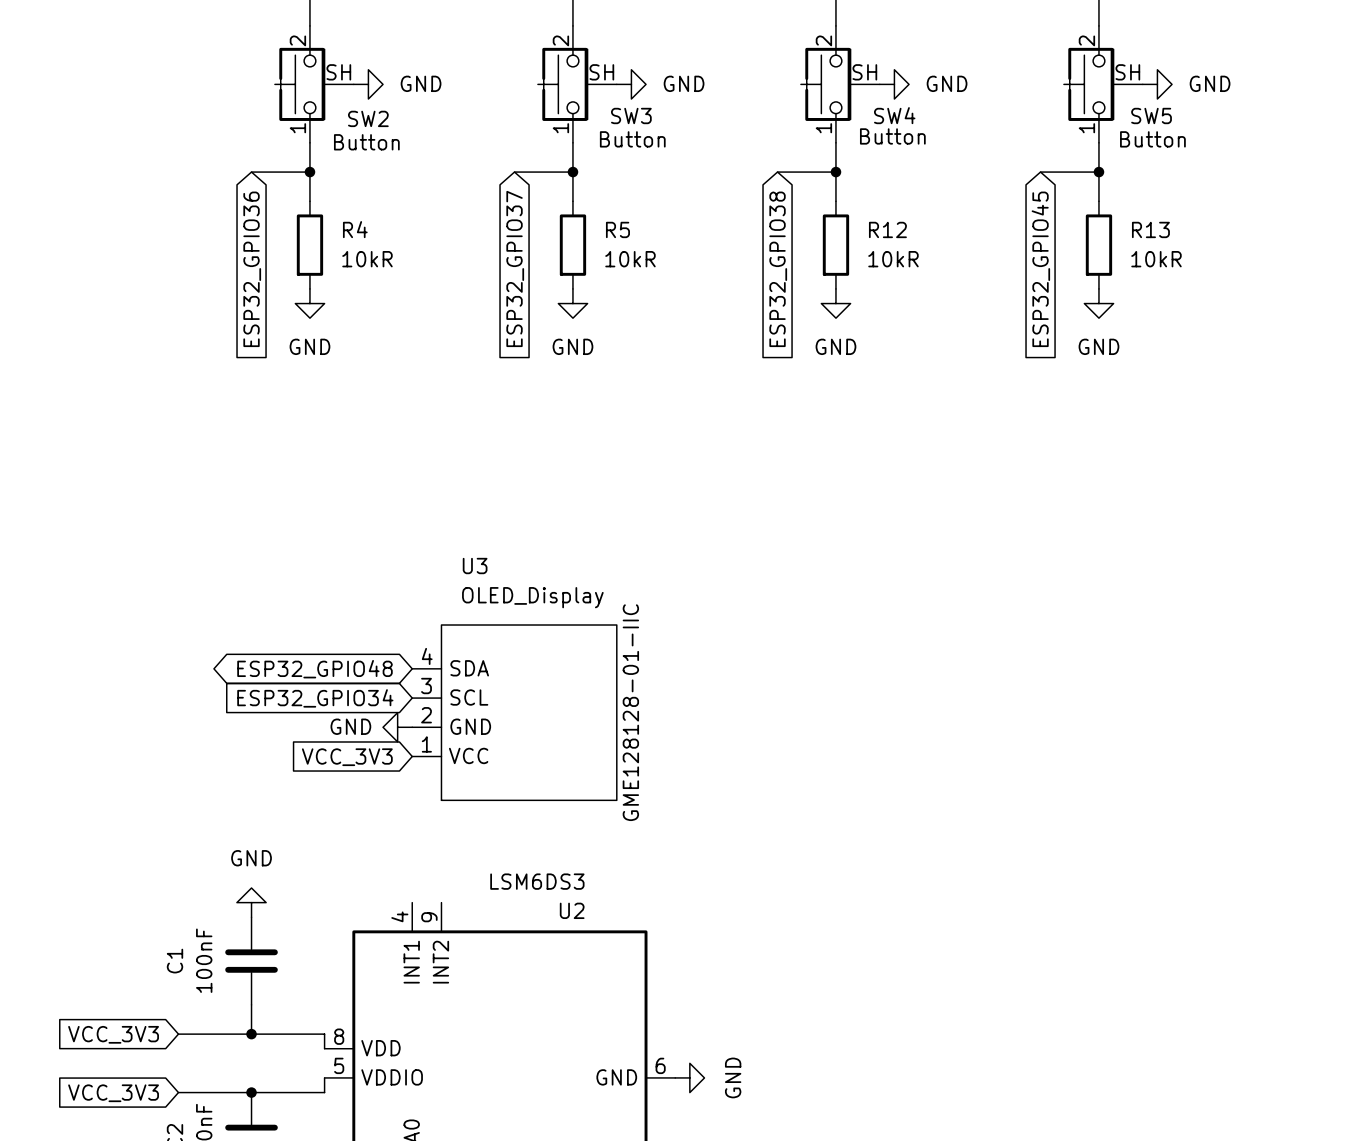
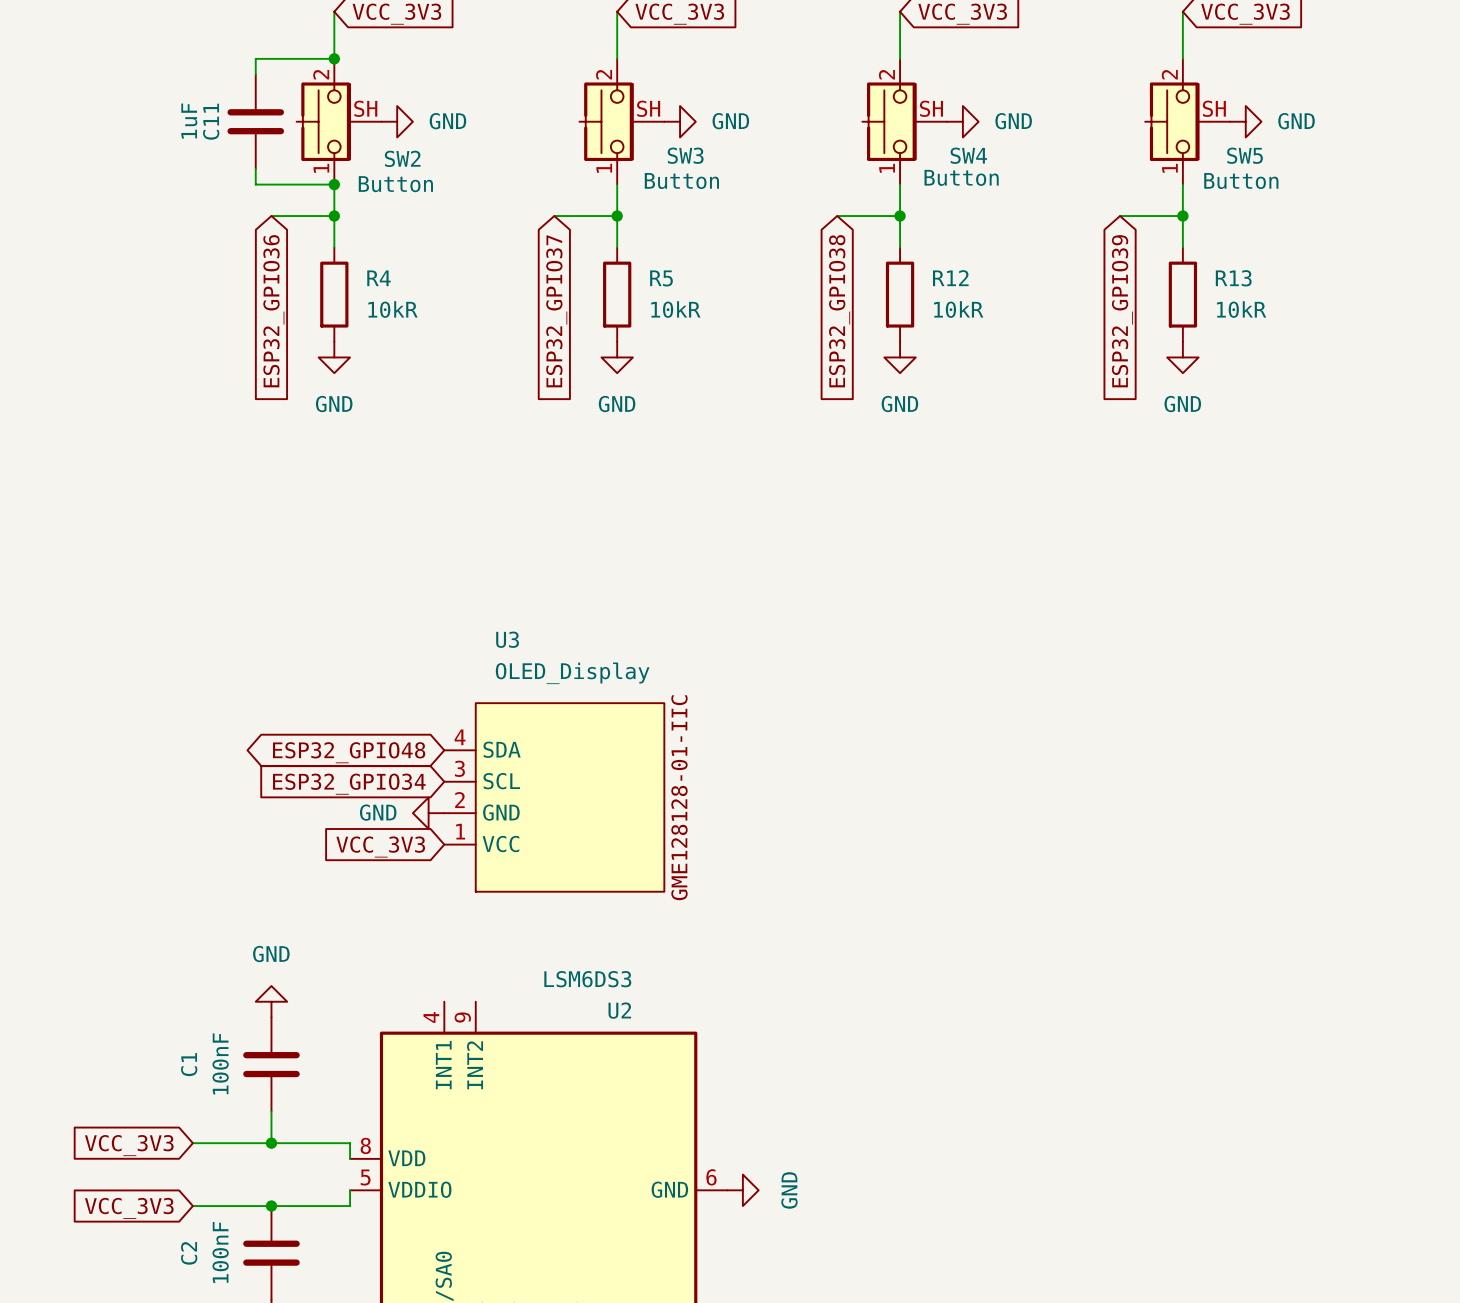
wire: none -> (334, 58) (255, 58) (255, 74)
junction: none -> (334, 58)
C11: none -> 1uF (255, 121)
wire: none -> (255, 168) (255, 184) (334, 184)
junction: none -> (334, 184)
global label: ESP32_GPIO45 (1040, 269) -> ESP32_GPIO39 (1122, 311)

